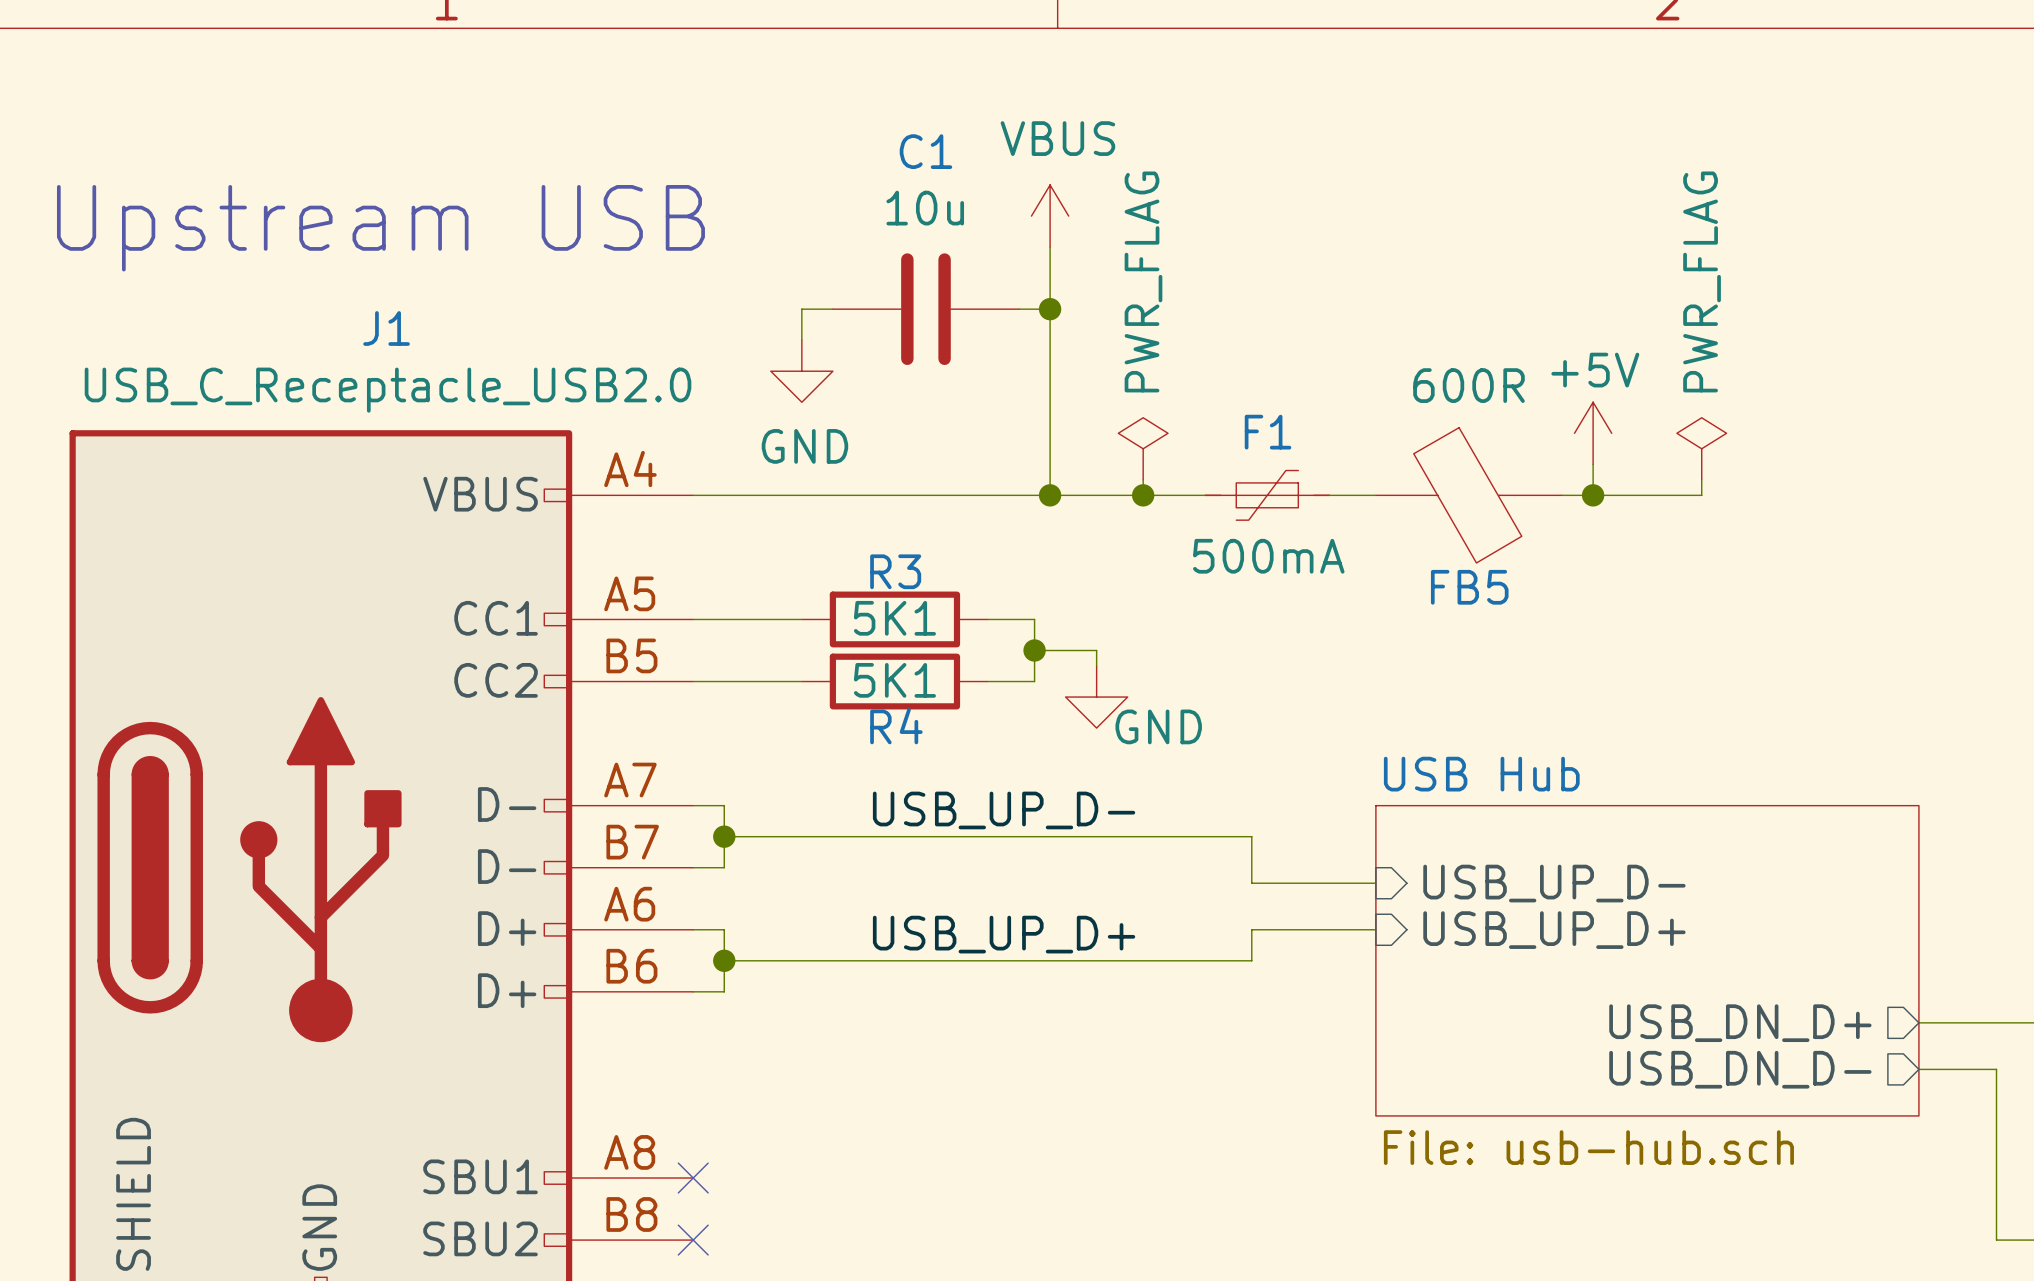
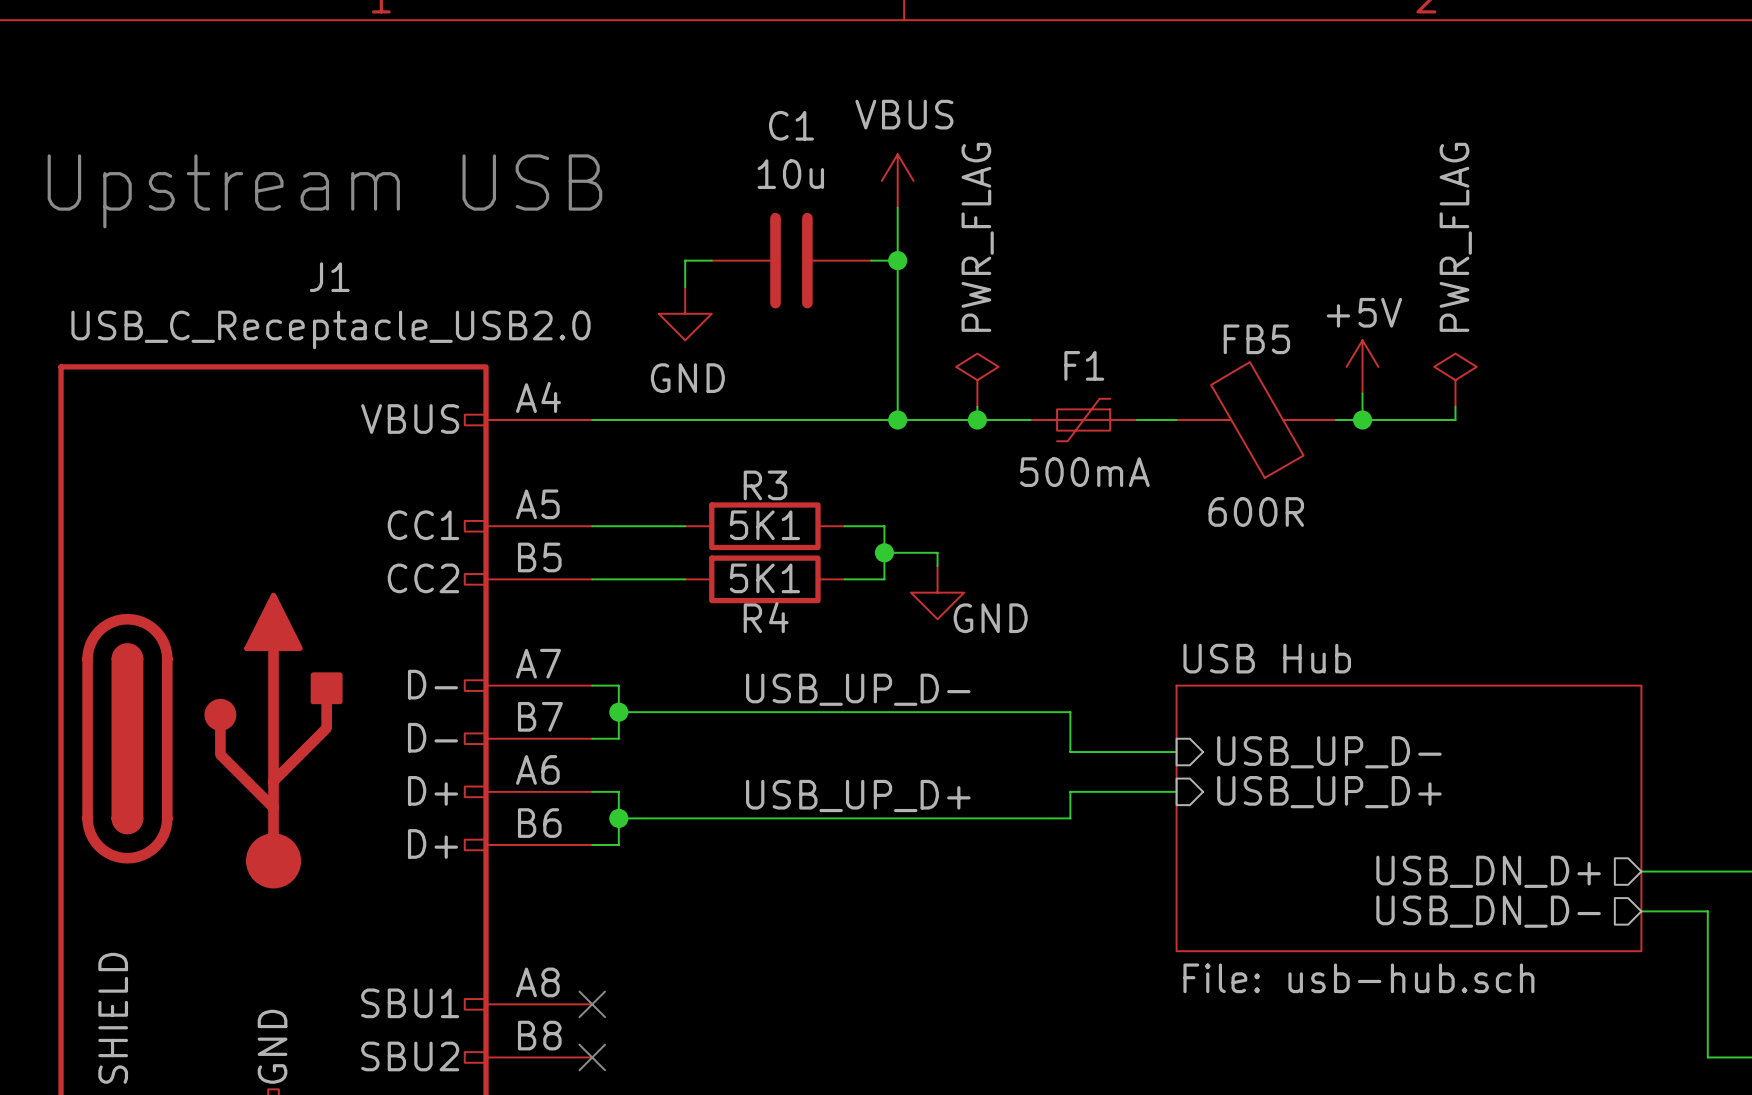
FB5 rotation: 0° (1467, 495) -> 180° (1257, 420)

